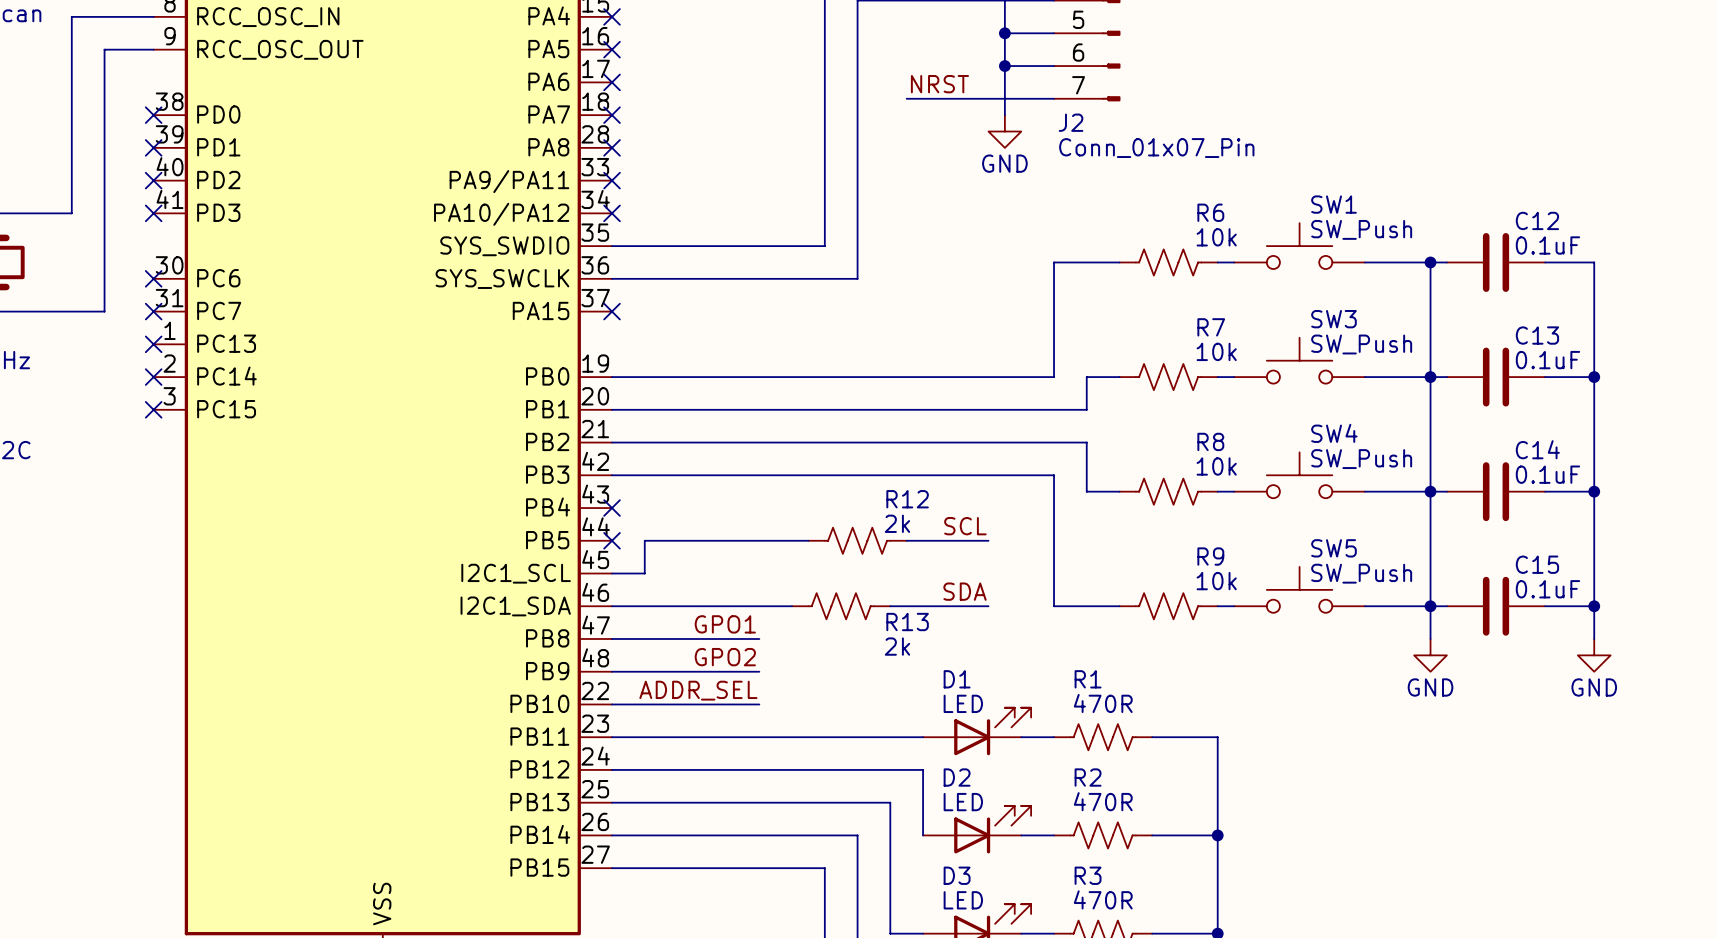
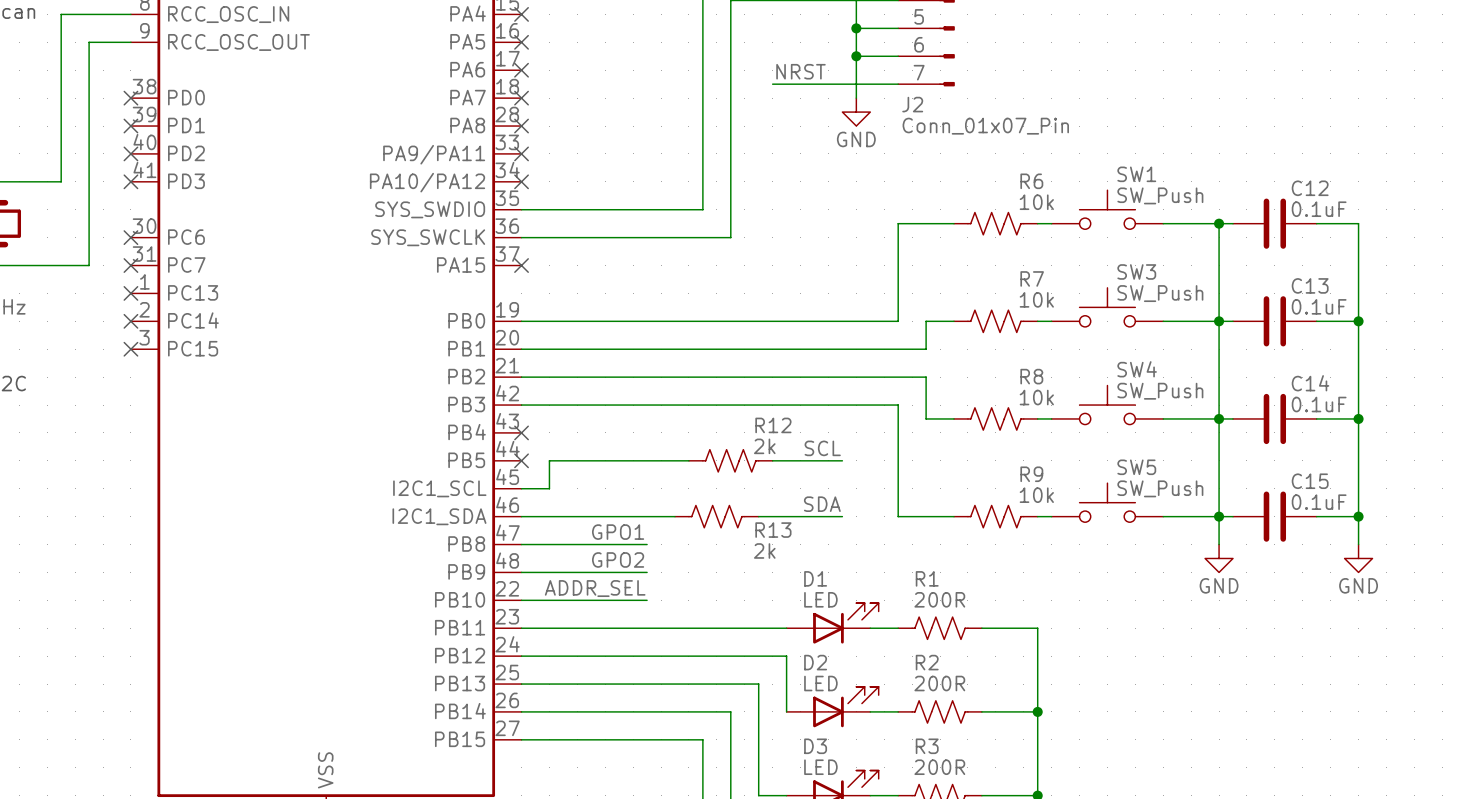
R1 value: 470R (1103, 703) -> 200R (939, 599)
R2 value: 470R (1103, 801) -> 200R (939, 683)
R3 value: 470R (1103, 899) -> 200R (939, 767)

